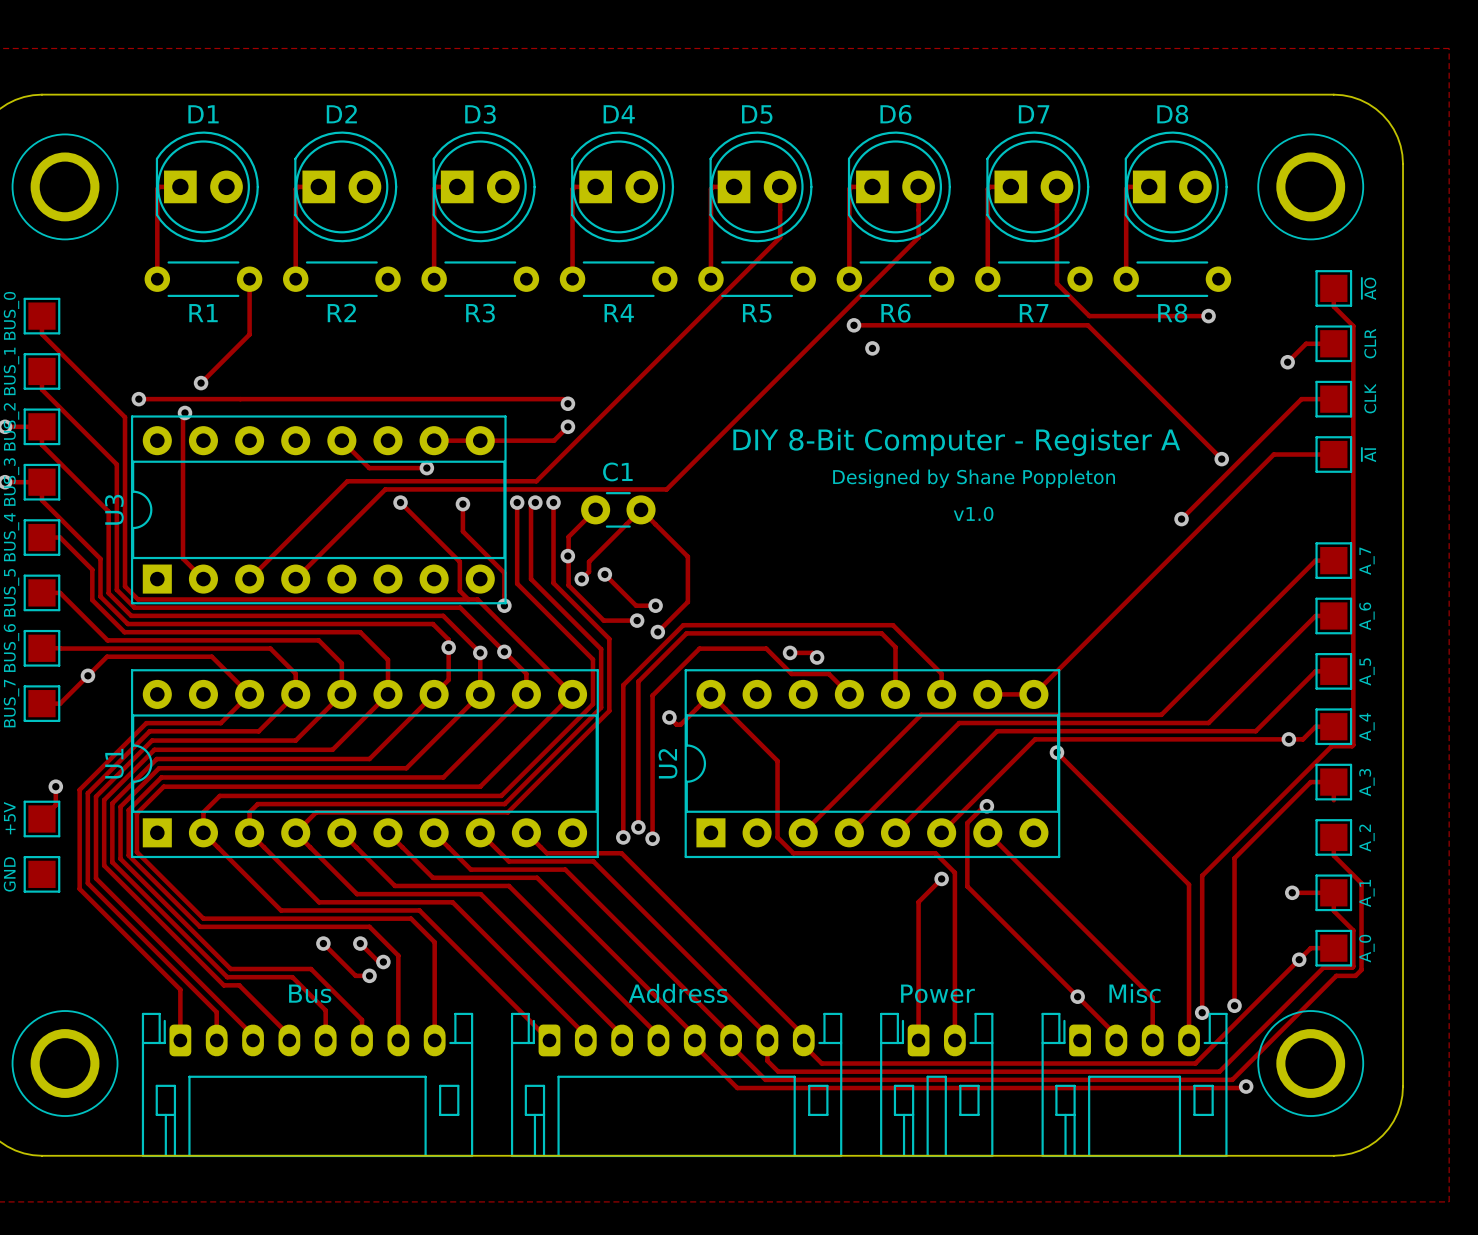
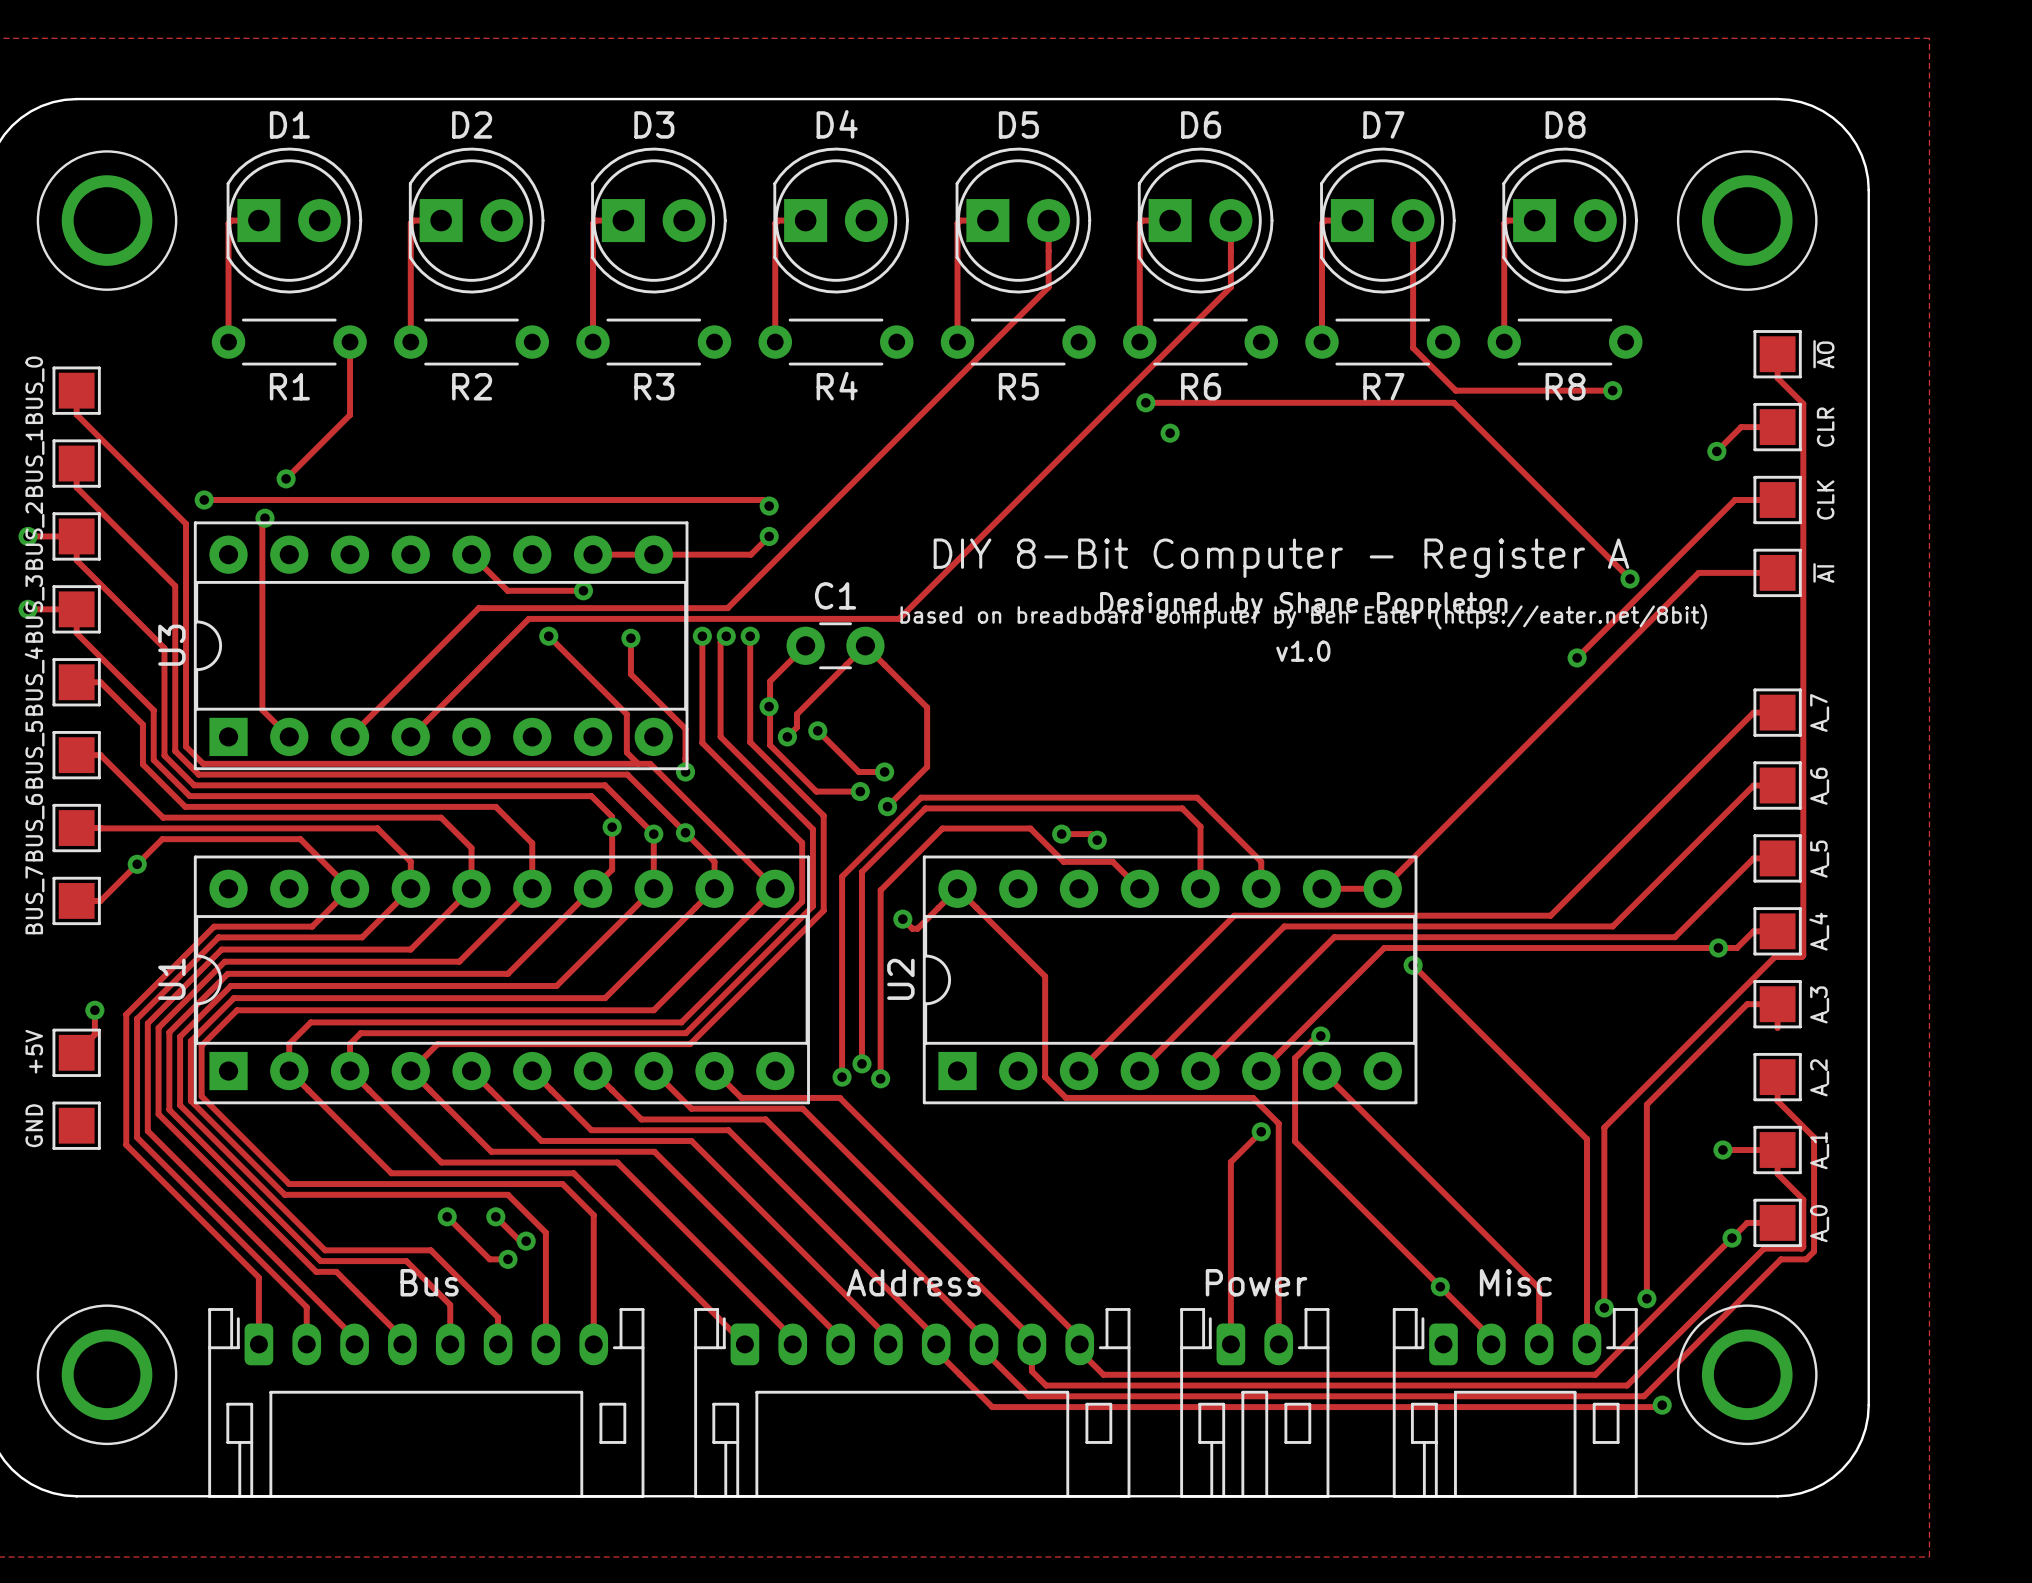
text: none -> based on breadboard computer by Ben Eater (https://eater.net/8bit) (1303, 616)

